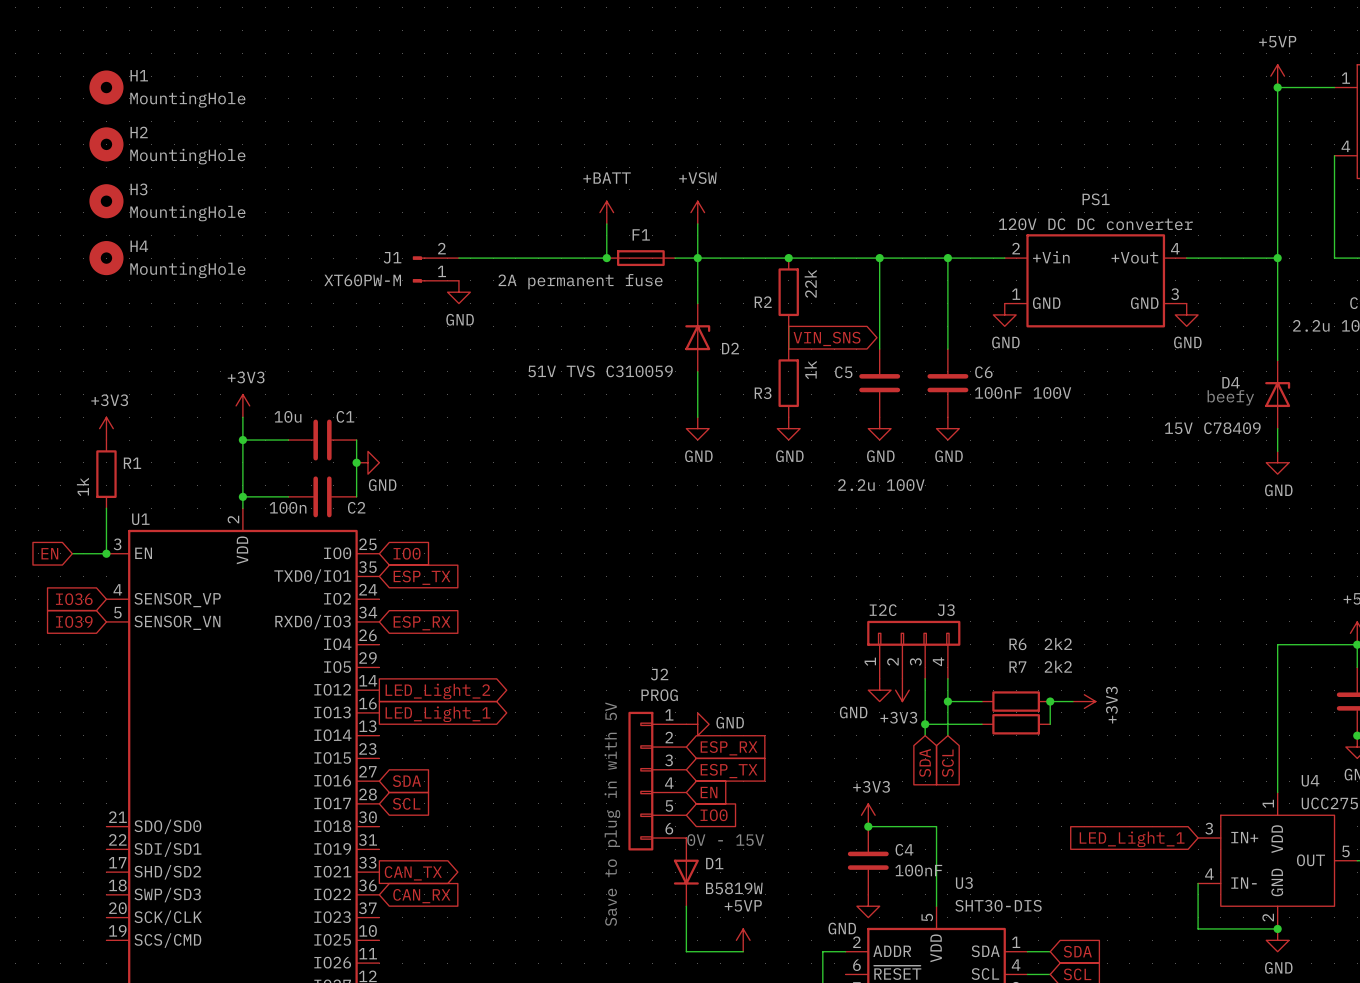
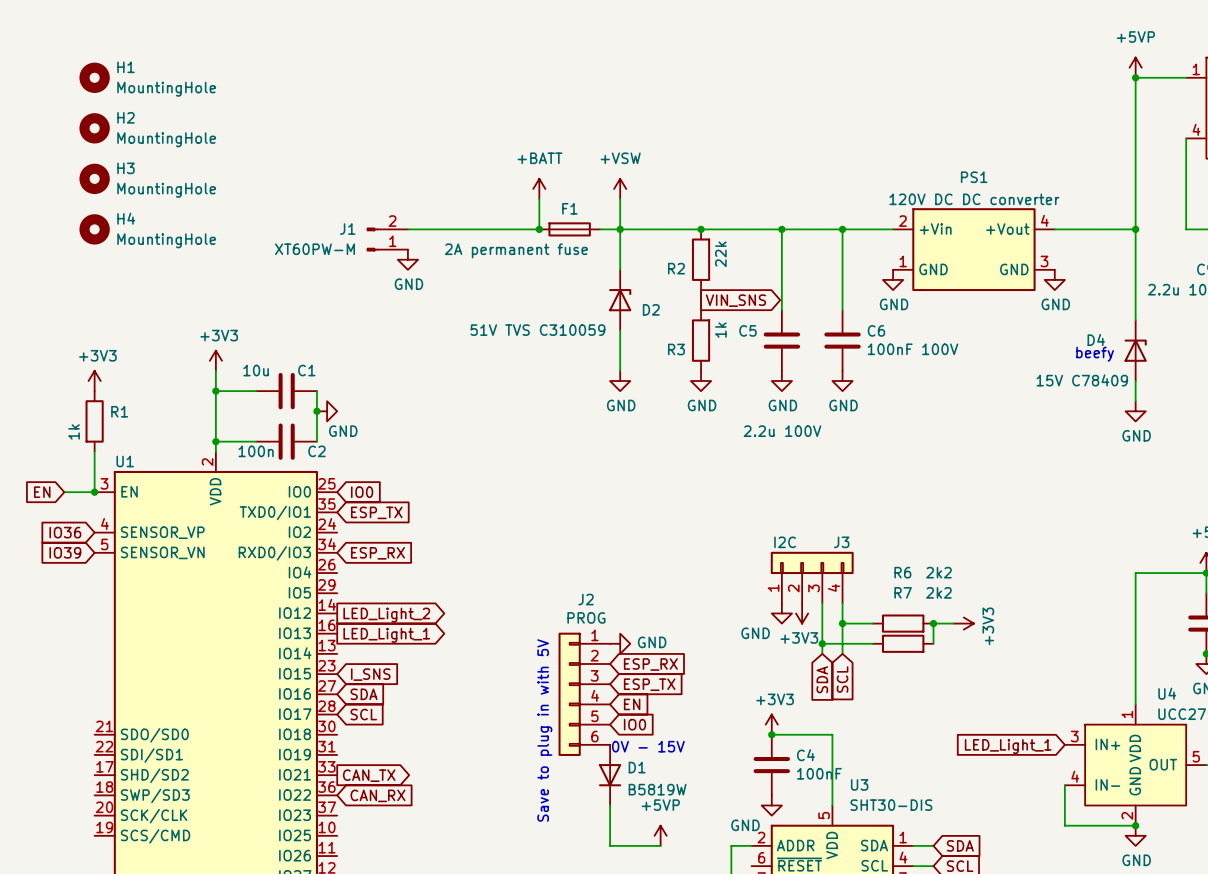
global label: none -> I_SNS (370, 674)

